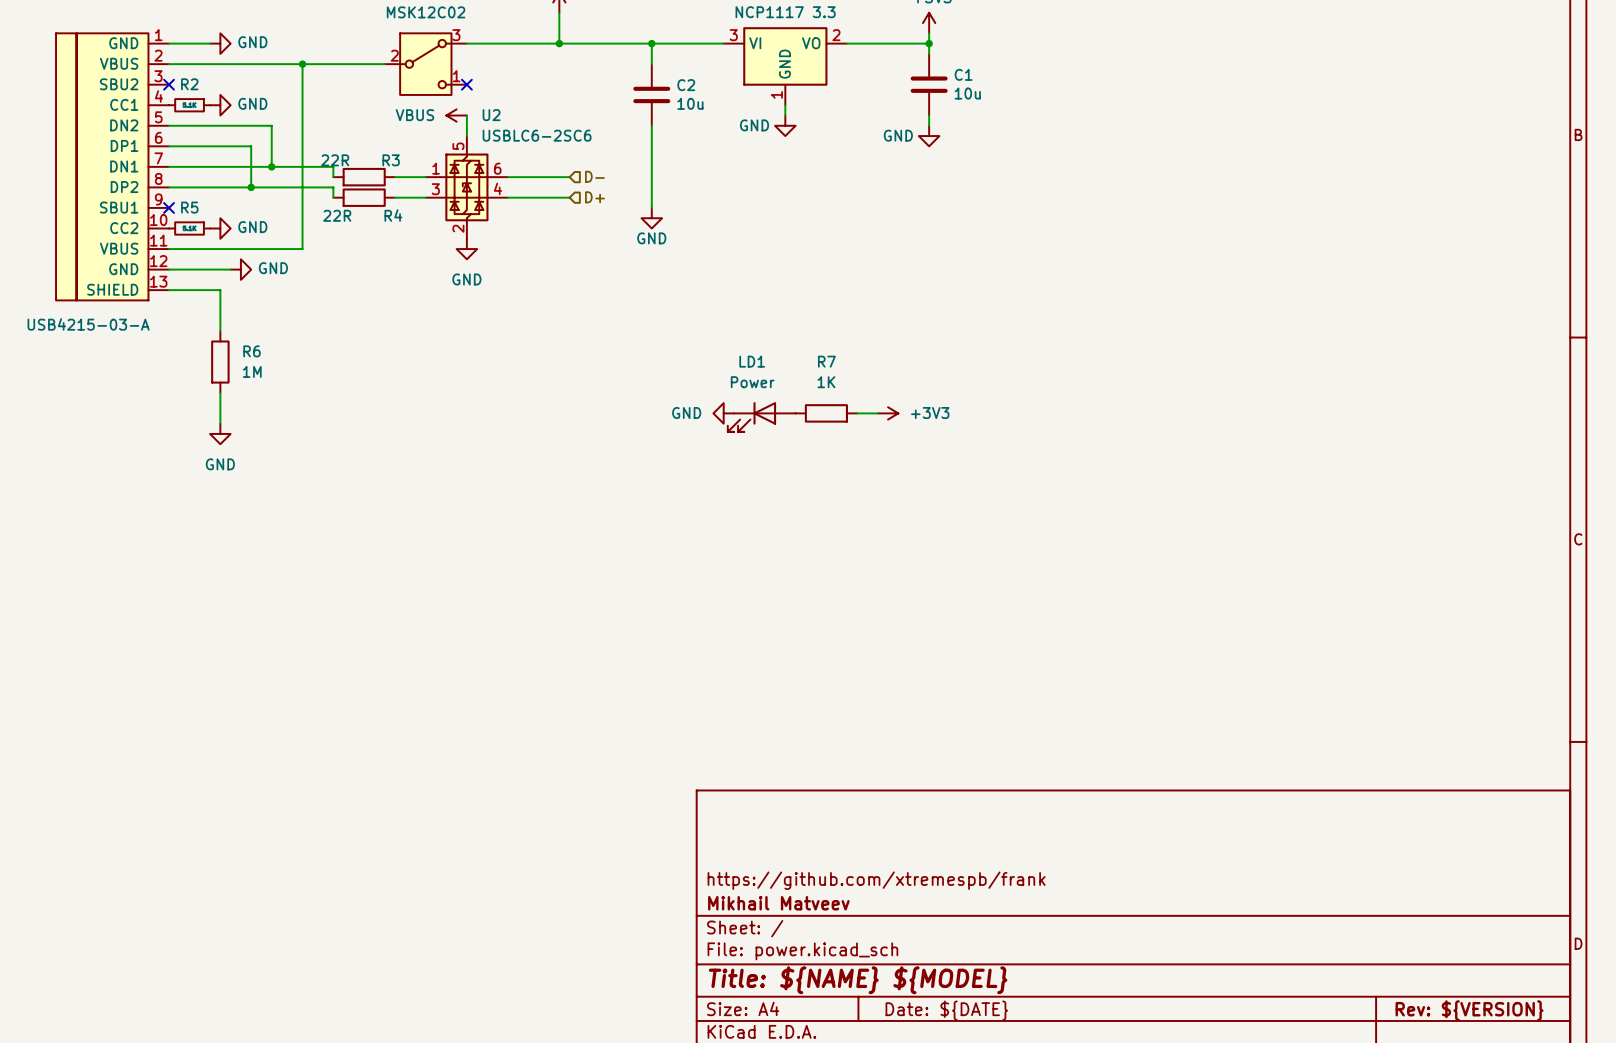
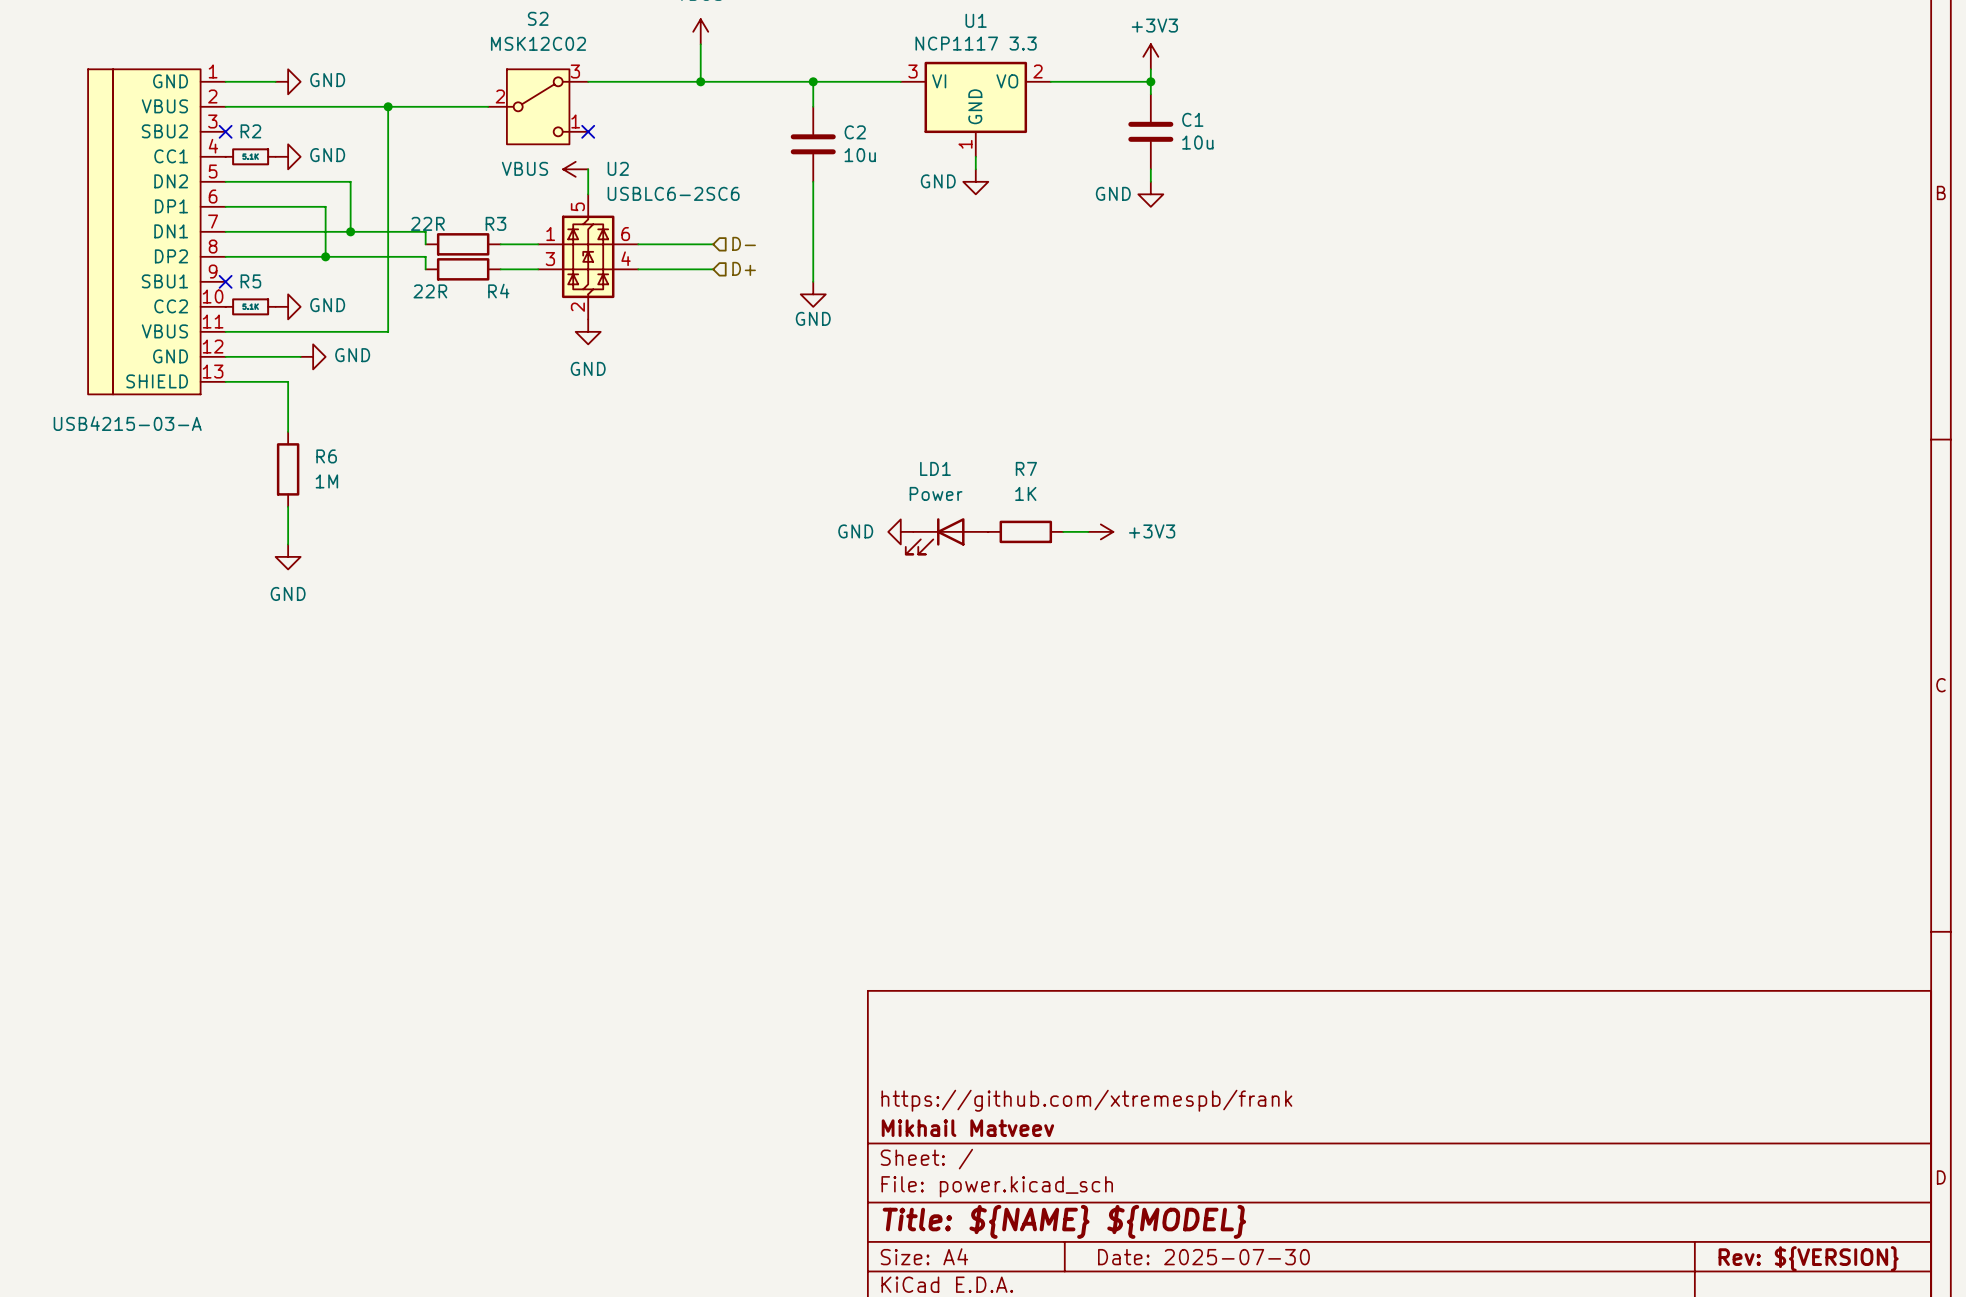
title block: Date: ${DATE} (946, 1010) -> Date: 2025-07-30 (1203, 1257)

